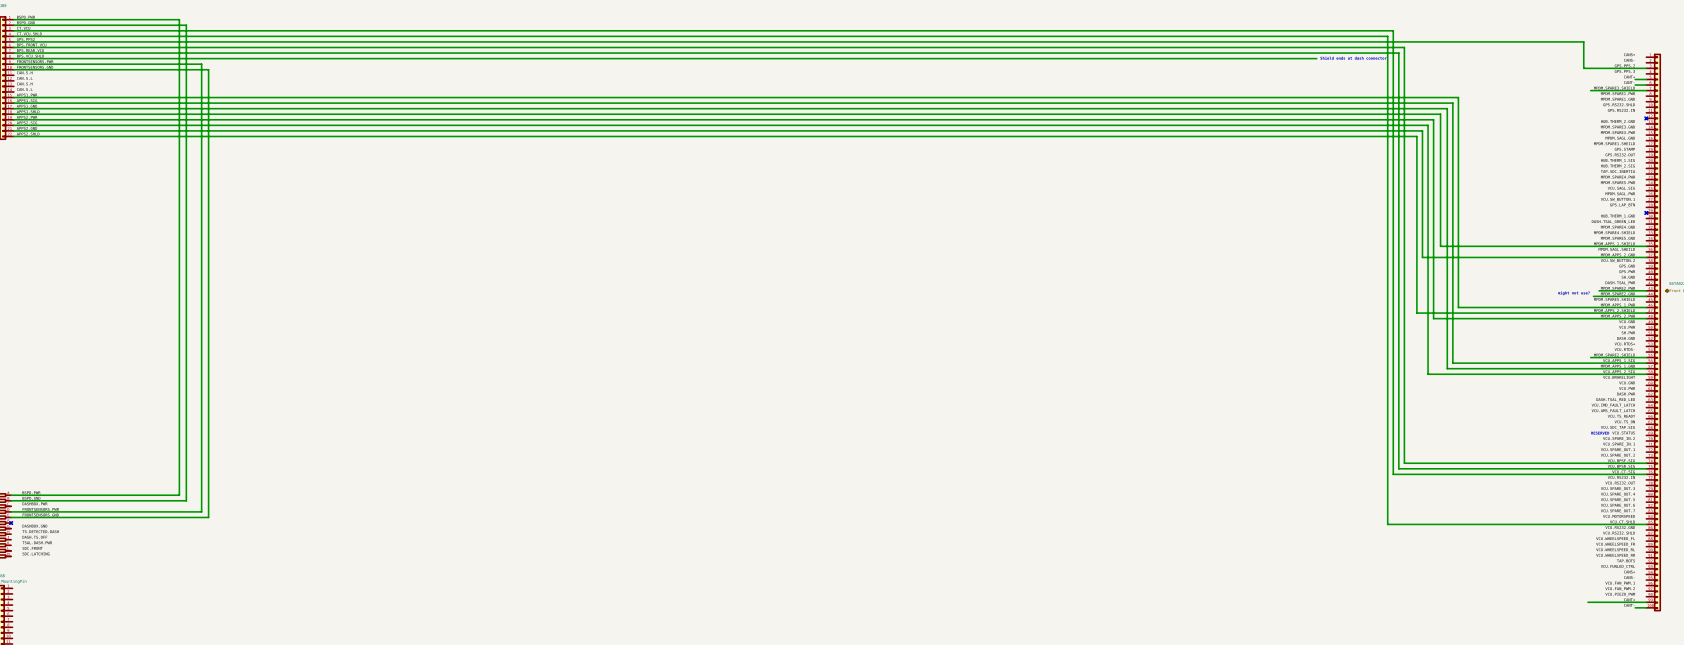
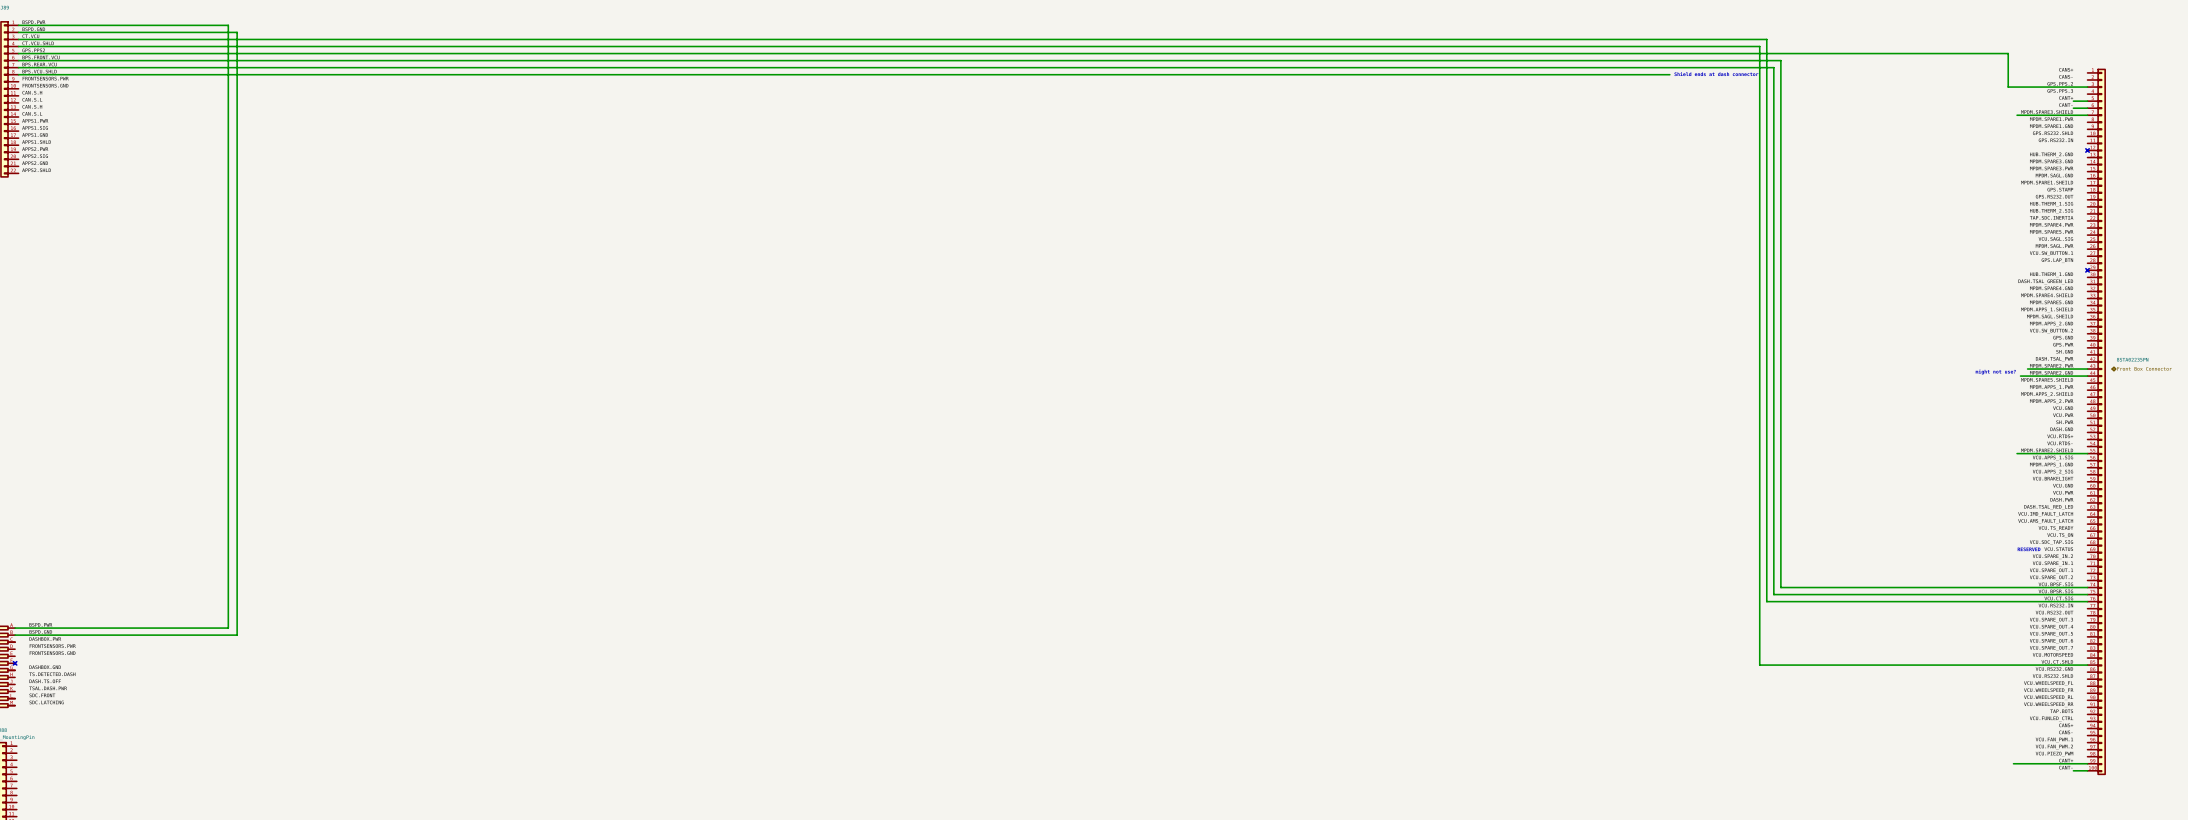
wire: (13, 64) (201, 64) (201, 511) (11, 511) -> none
wire: (13, 69) (208, 69) (208, 517) (11, 517) -> none
wire: (13, 97) (1458, 97) (1458, 307) (1646, 307) -> none
wire: (13, 103) (1452, 103) (1452, 363) (1646, 363) -> none
wire: (13, 108) (1447, 108) (1447, 368) (1646, 368) -> none
wire: (13, 114) (1440, 114) (1440, 246) (1646, 246) -> none
wire: (13, 119) (1433, 119) (1433, 318) (1646, 318) -> none
wire: (13, 125) (1428, 125) (1428, 374) (1646, 374) -> none
wire: (13, 130) (1422, 130) (1422, 257) (1646, 257) -> none
wire: (13, 136) (1416, 136) (1416, 313) (1646, 313) -> none

